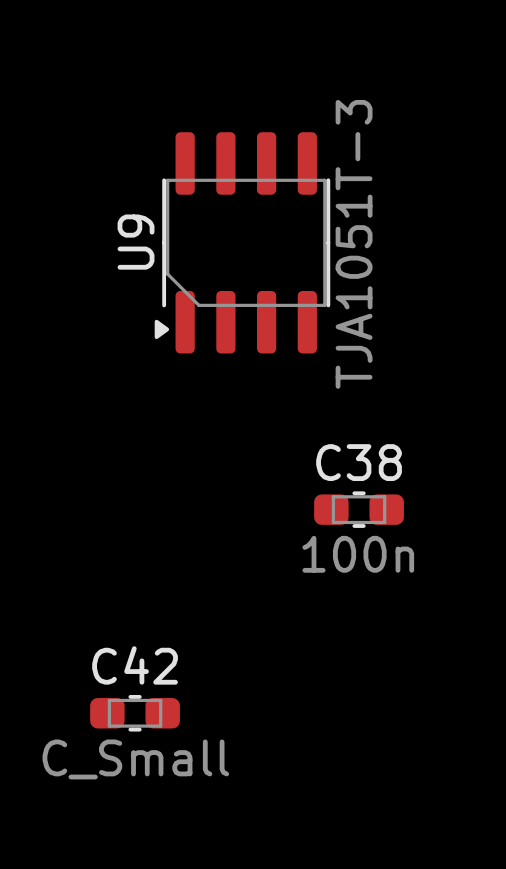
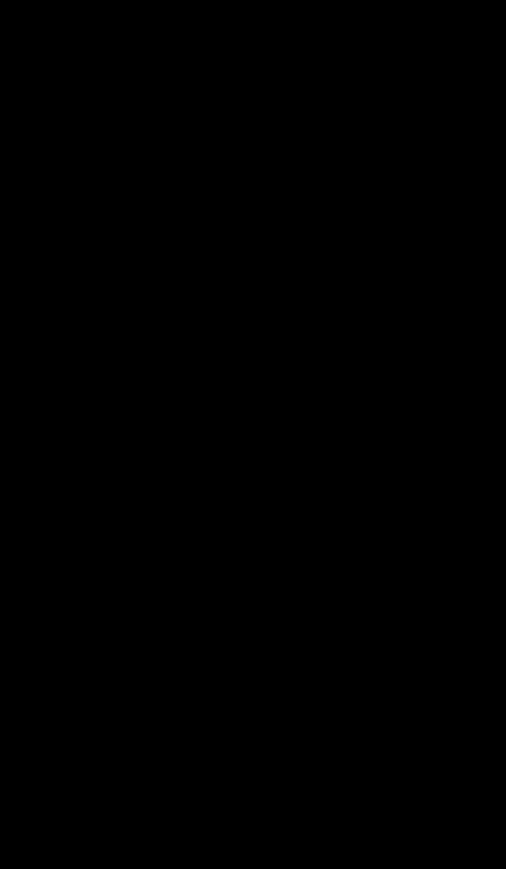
U9: TJA1051T-3 (242, 242) -> none
C38: 100n (359, 509) -> none
C42: C_Small (135, 713) -> none

